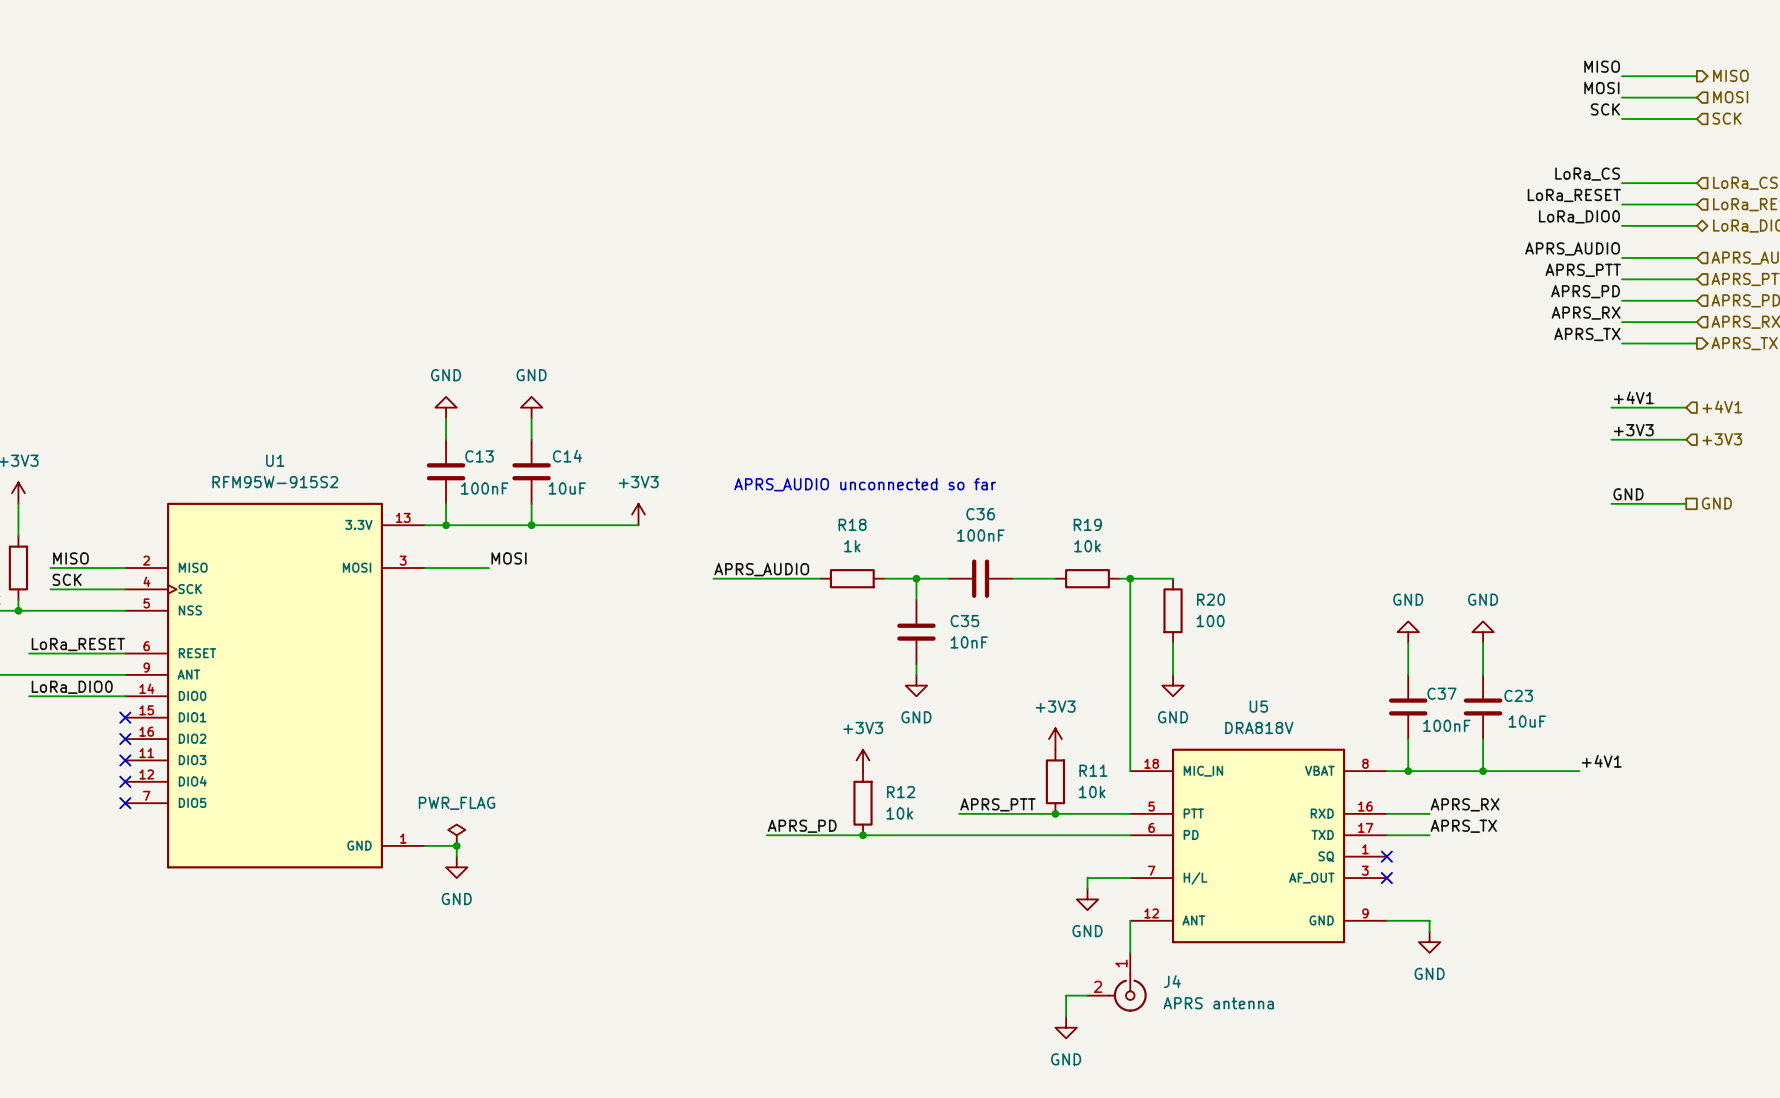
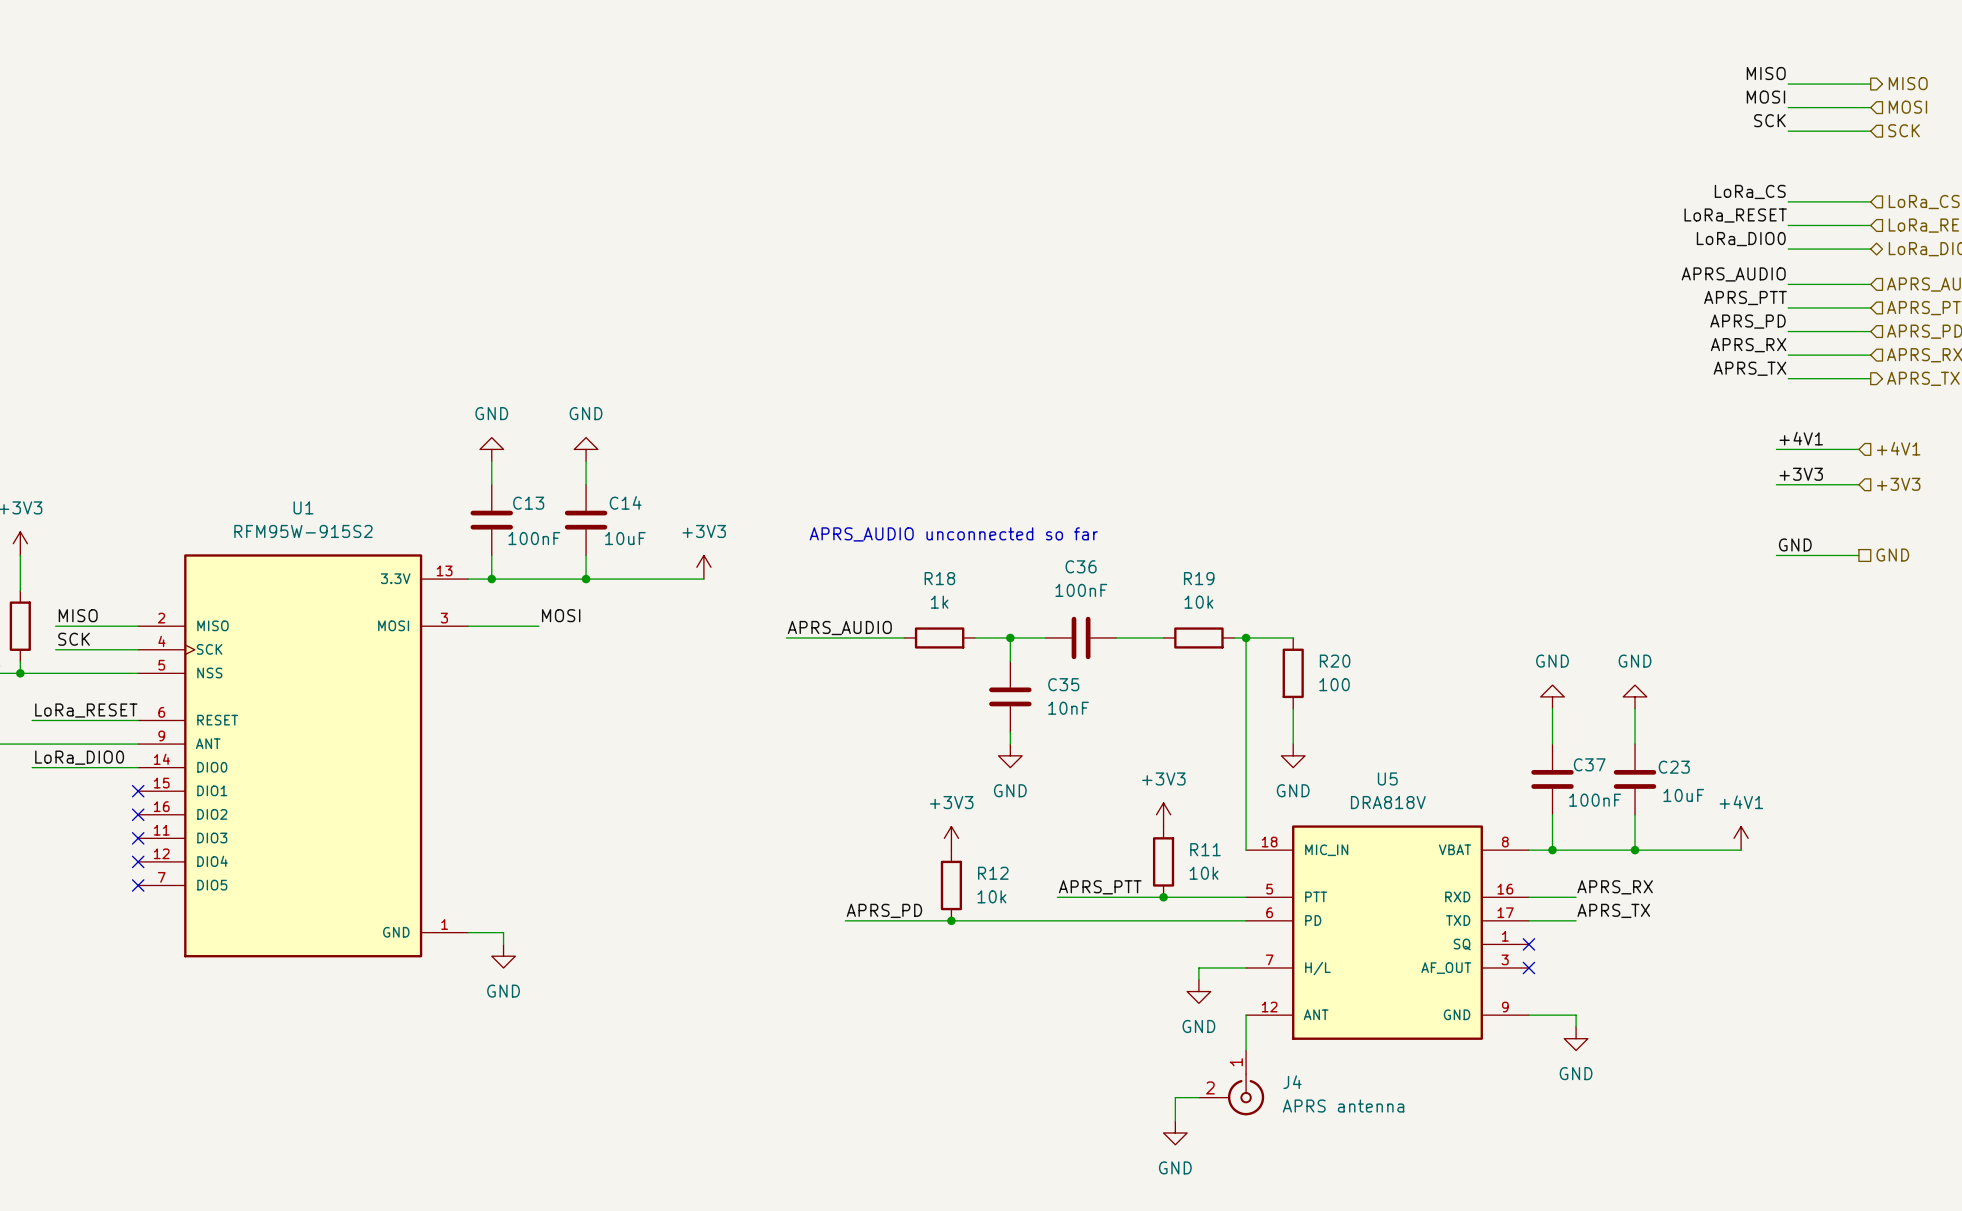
power symbol: none -> +4V1 (1741, 838)
label: +4V1 (1601, 761) -> none
power symbol: PWR_FLAG (456, 835) -> none
junction: (456, 845) -> none

